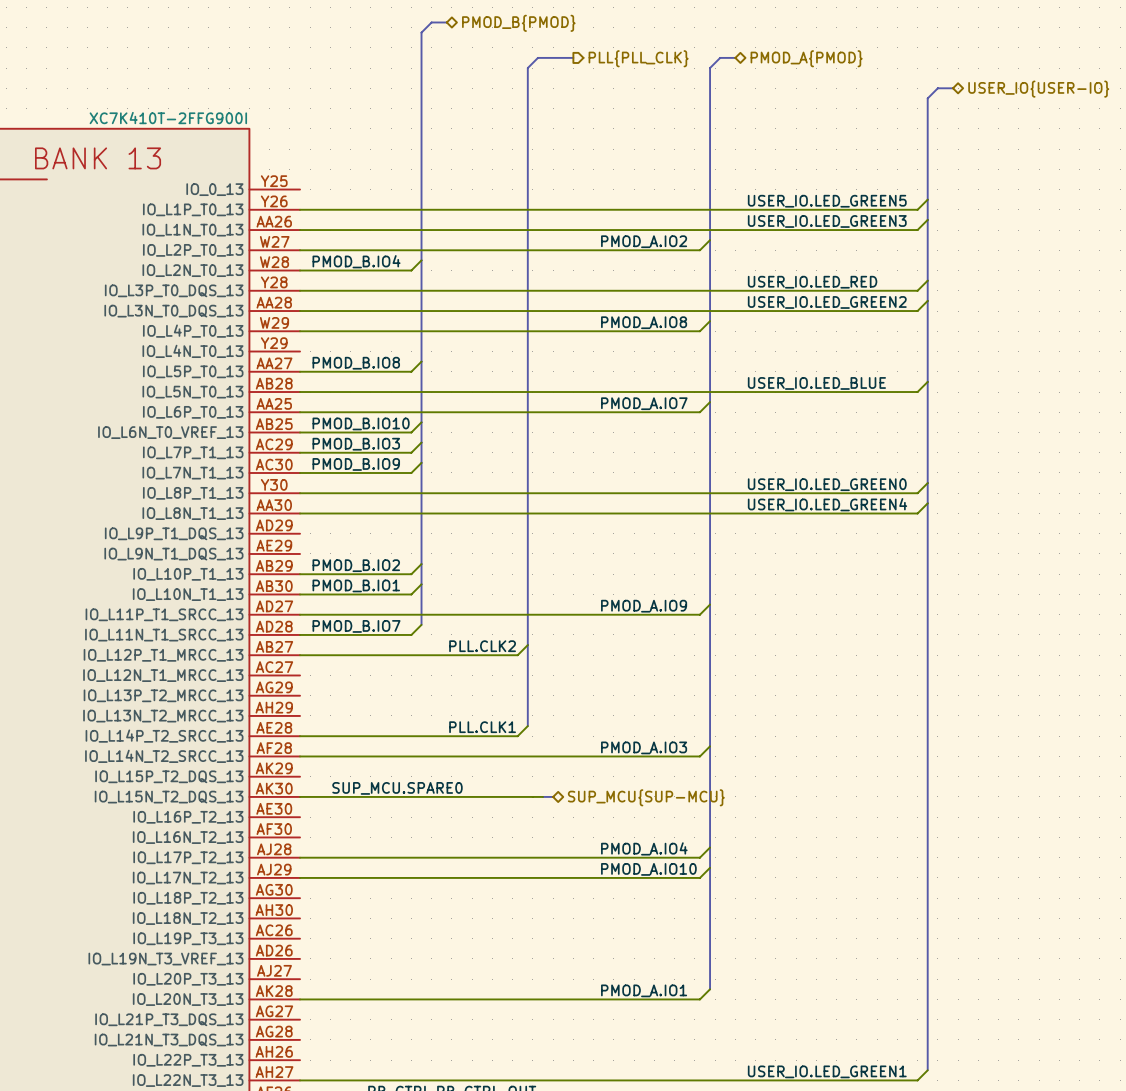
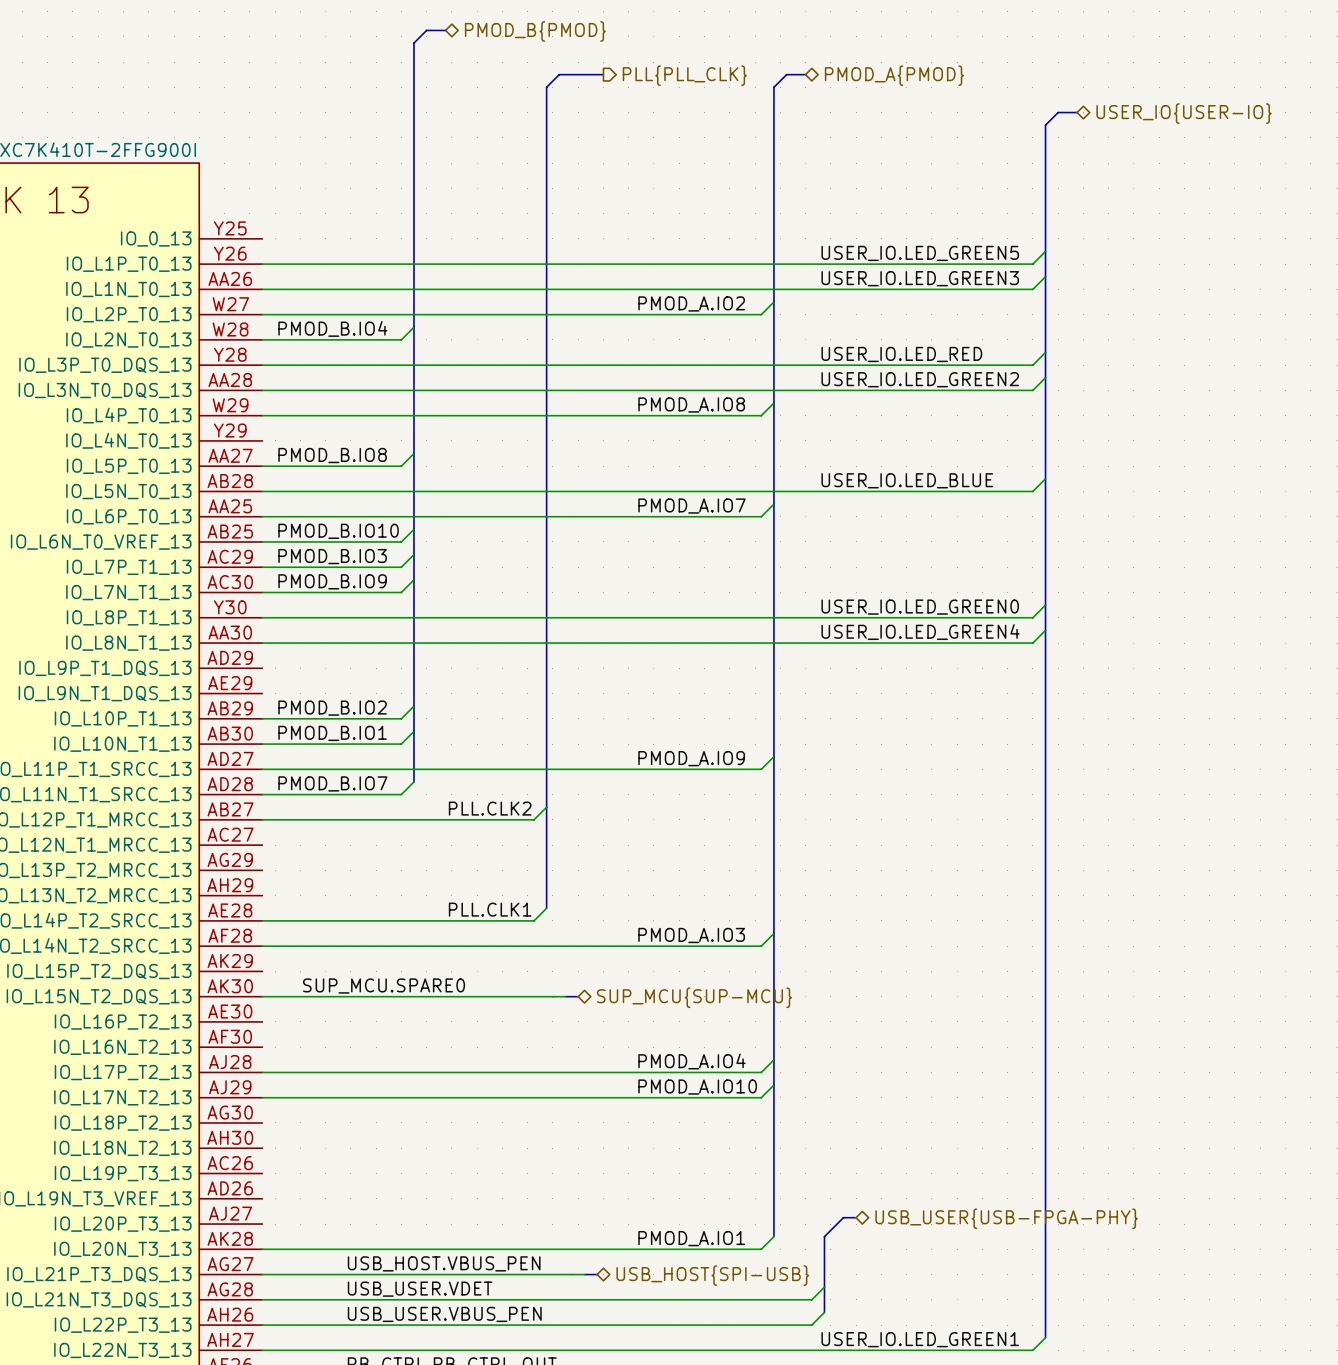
bus: none -> (856, 1217) (843, 1217) (824, 1236) (824, 1312)
hierarchical label: none -> USB_USER{USB-FPGA-PHY} (1006, 1218)
label: none -> USB_HOST.VBUS_PEN (444, 1263)
wire: none -> (262, 1274) (584, 1274)
bus: none -> (584, 1274) (597, 1274)
hierarchical label: none -> USB_HOST{SPI-USB} (712, 1275)
wire: none -> (824, 1287) (811, 1299) (262, 1299)
label: none -> USB_USER.VDET (420, 1289)
wire: none -> (824, 1312) (811, 1325) (262, 1325)
label: none -> USB_USER.VBUS_PEN (444, 1314)

